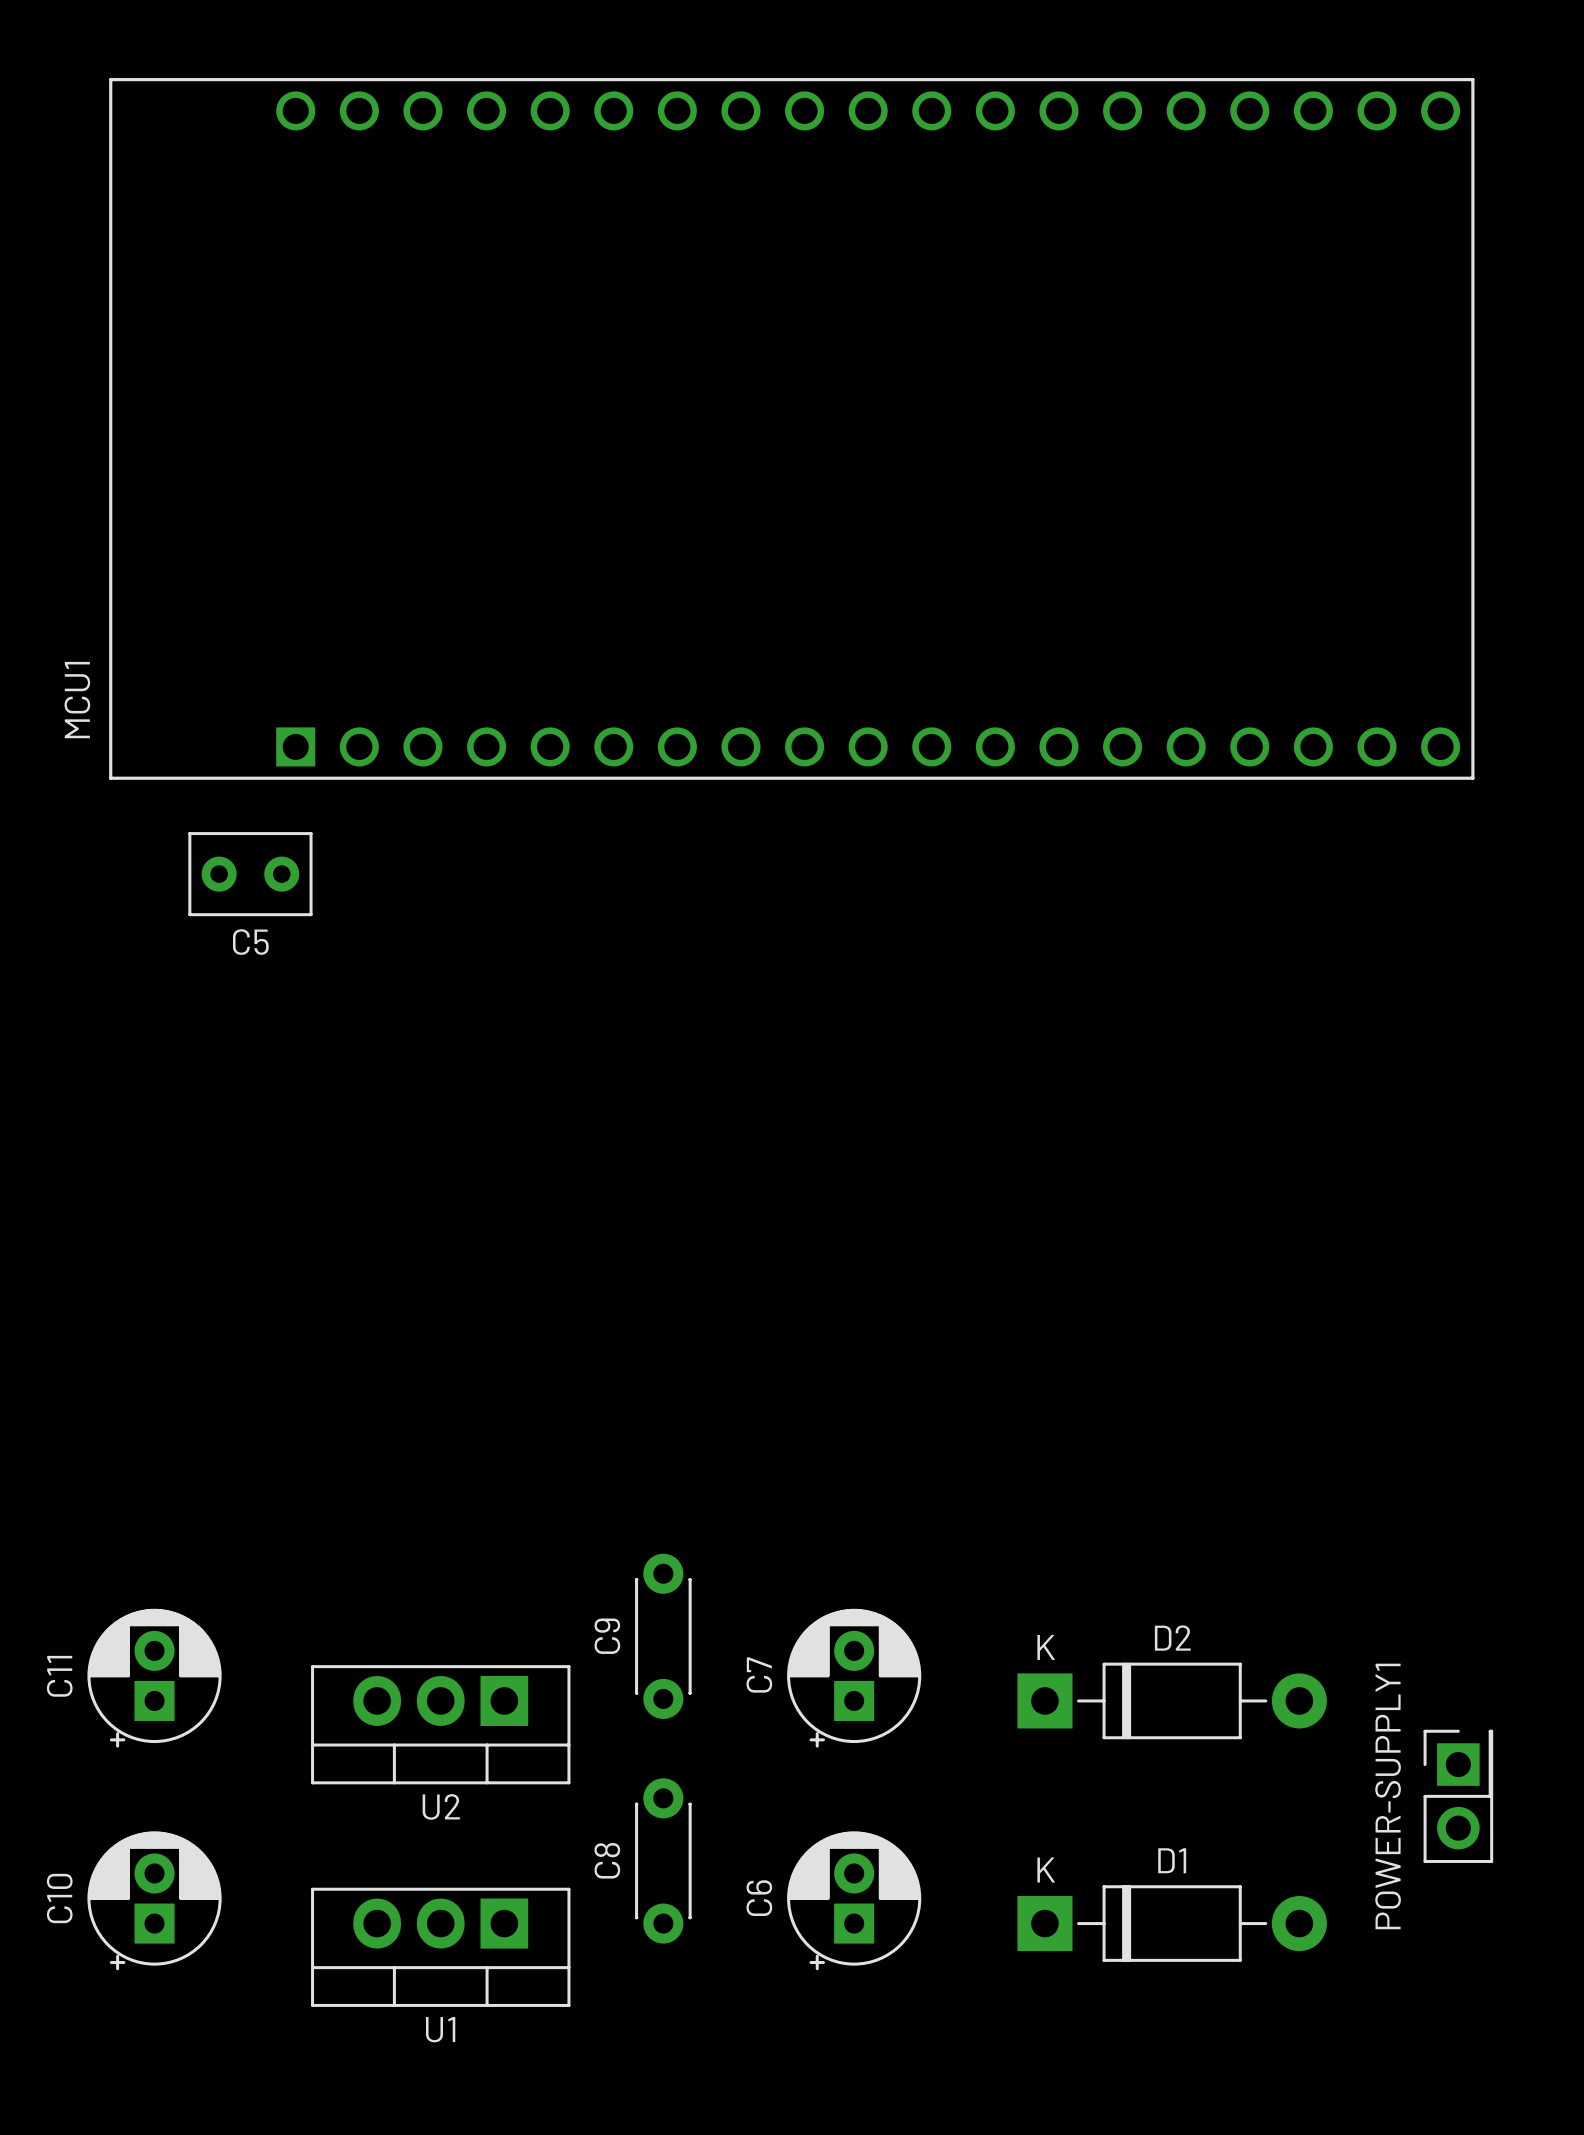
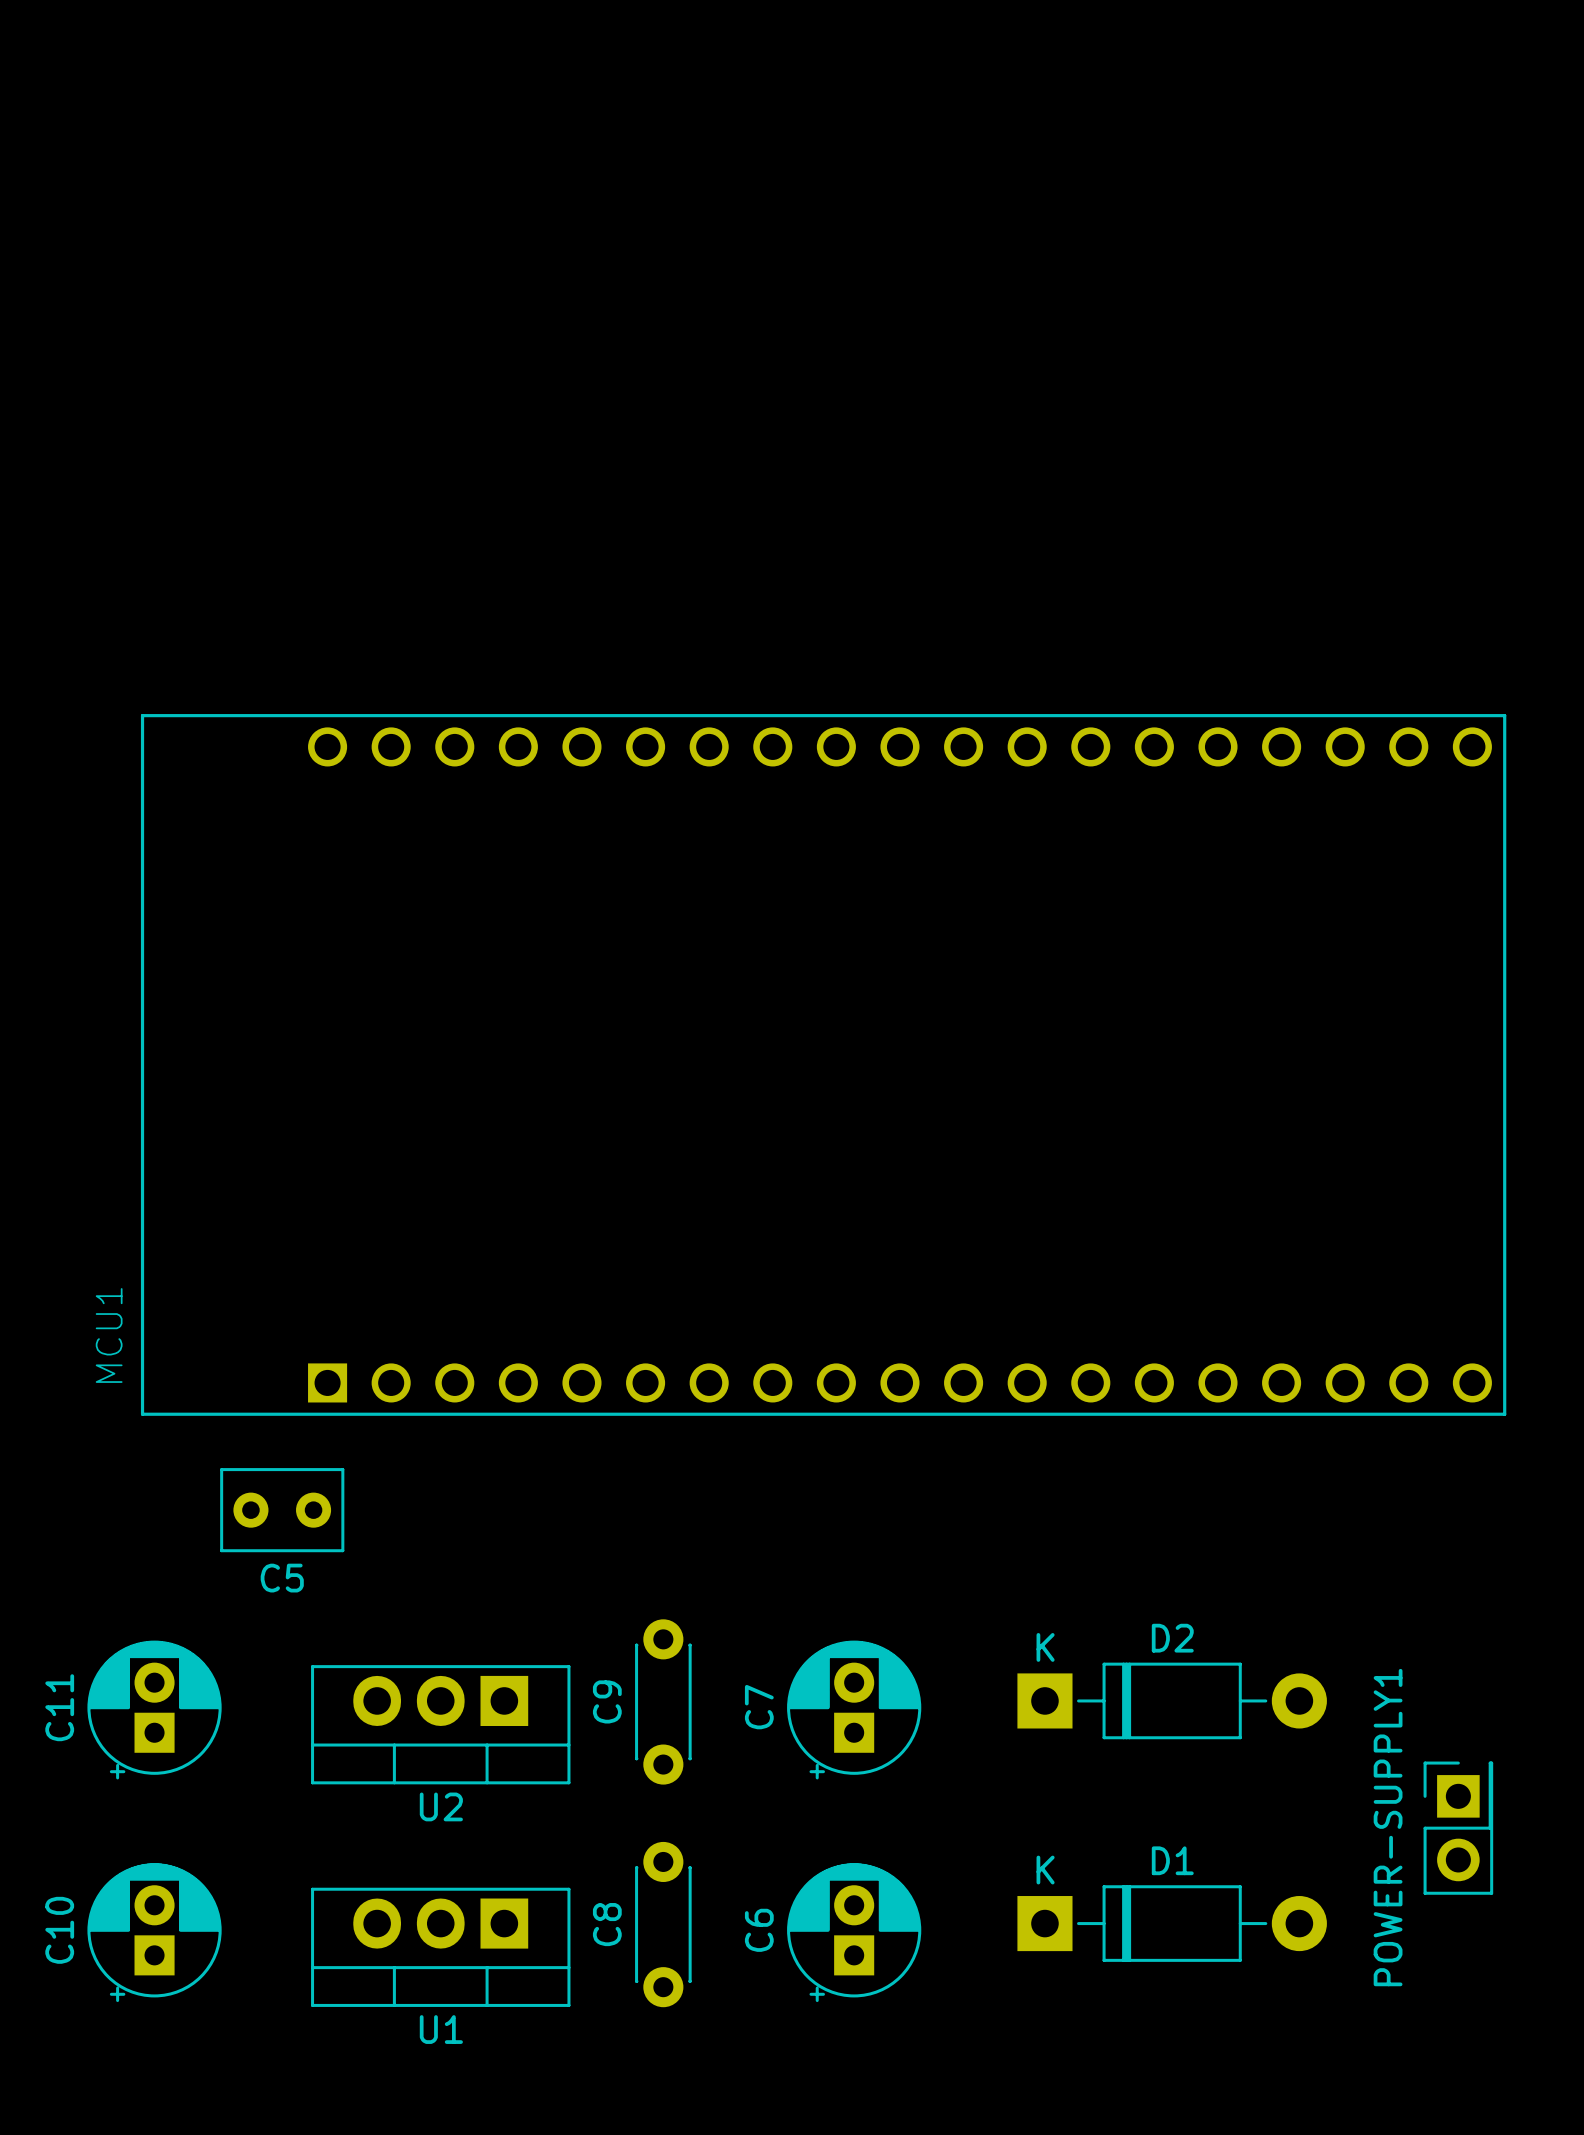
MCU1 position: (791, 428) -> (823, 1064)
C5 position: (250, 874) -> (282, 1510)
C9 position: (663, 1636) -> (663, 1701)
C11 position: (154, 1678) -> (154, 1710)
C7 position: (854, 1678) -> (854, 1710)
POWER-SUPPLY1 position: (1458, 1796) -> (1458, 1828)
C8 position: (663, 1860) -> (663, 1924)
C10 position: (154, 1900) -> (154, 1932)
C6 position: (854, 1900) -> (854, 1932)

